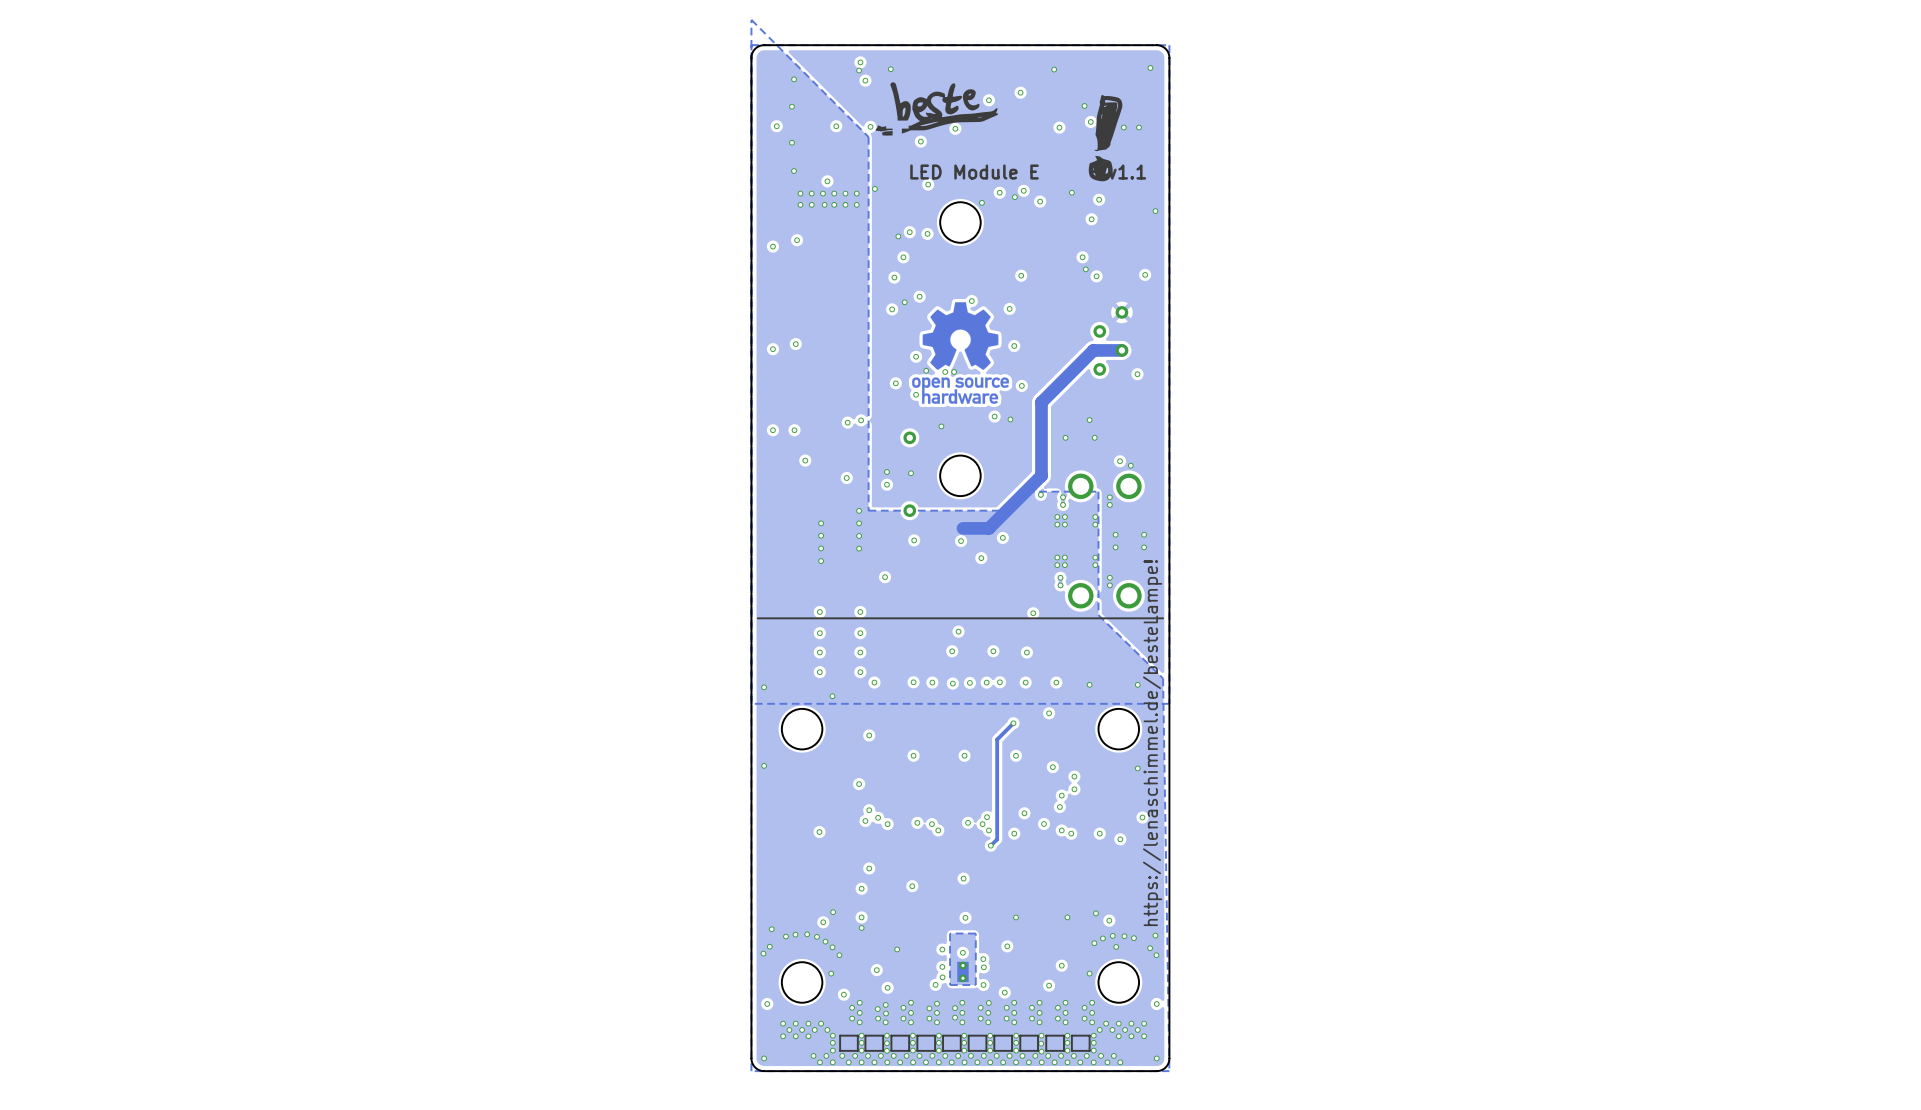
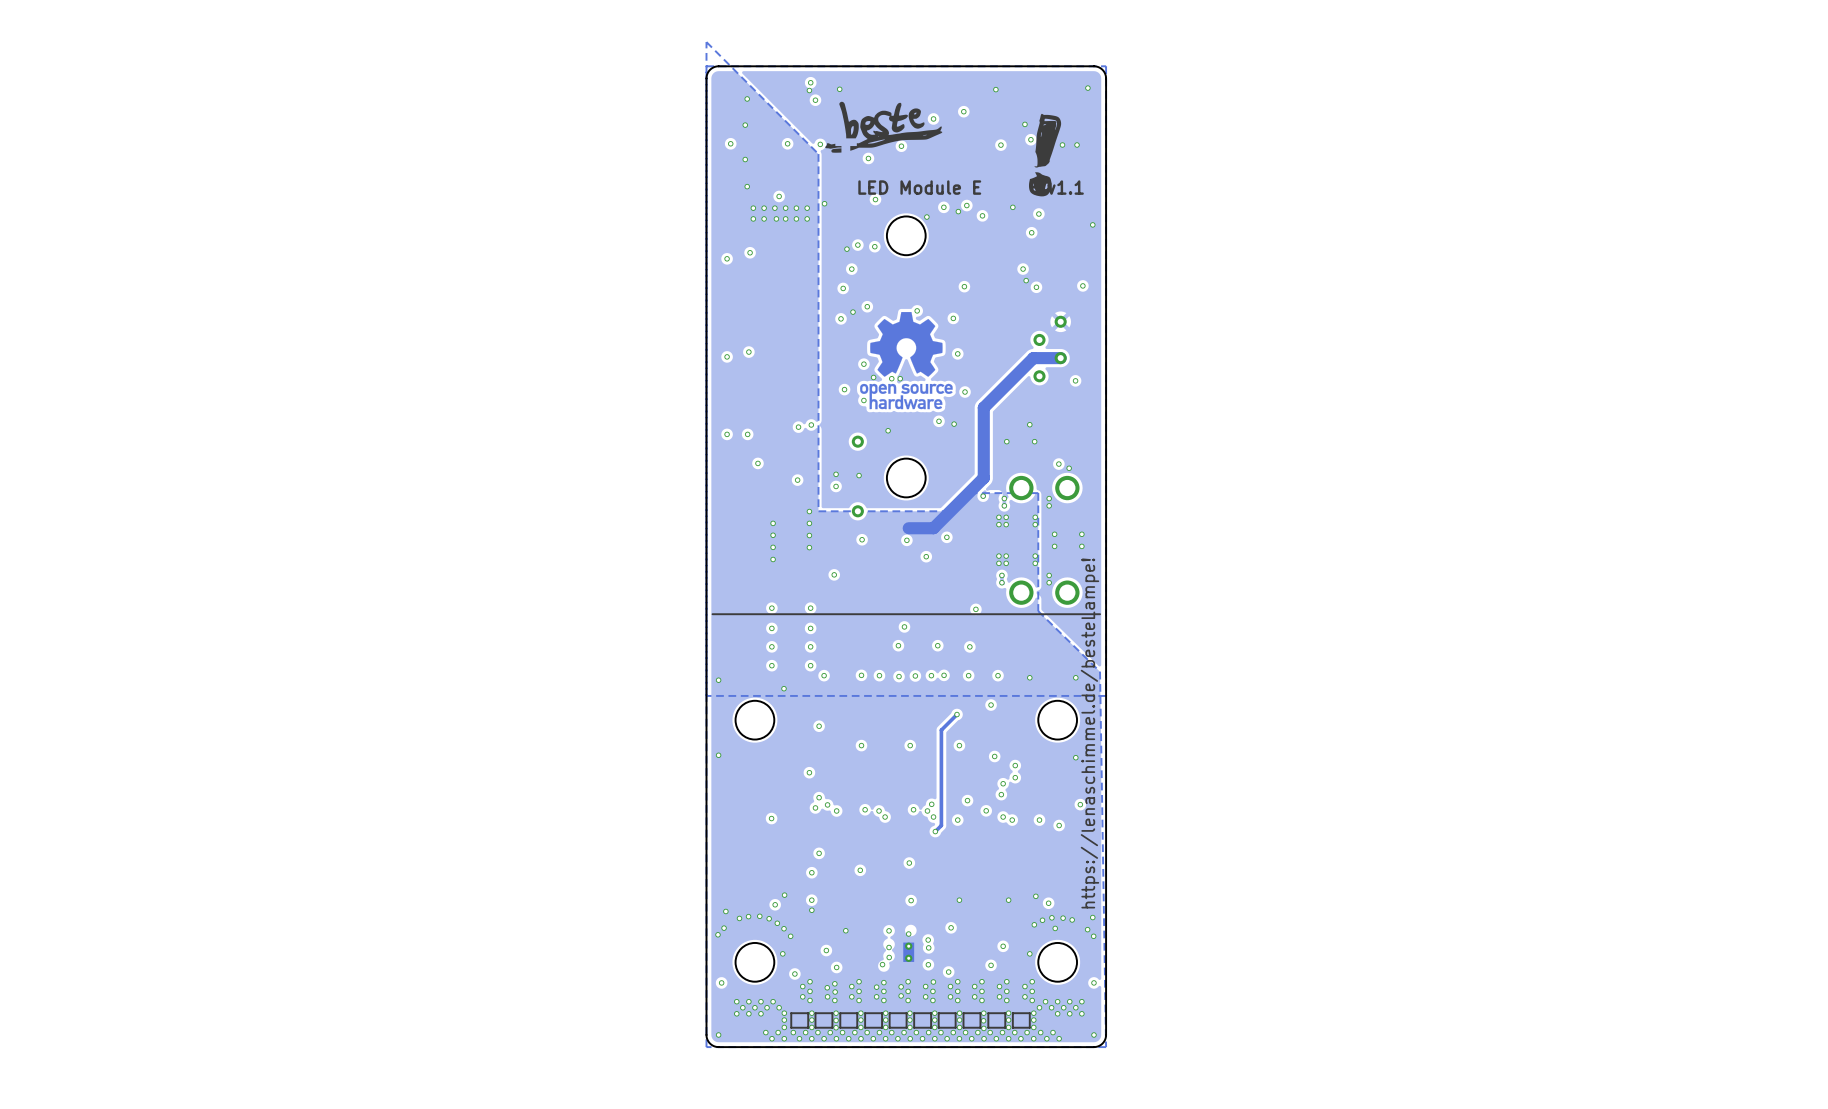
zone outline: (975, 933) (950, 933) (950, 985) (975, 985) (975, 933) -> none

